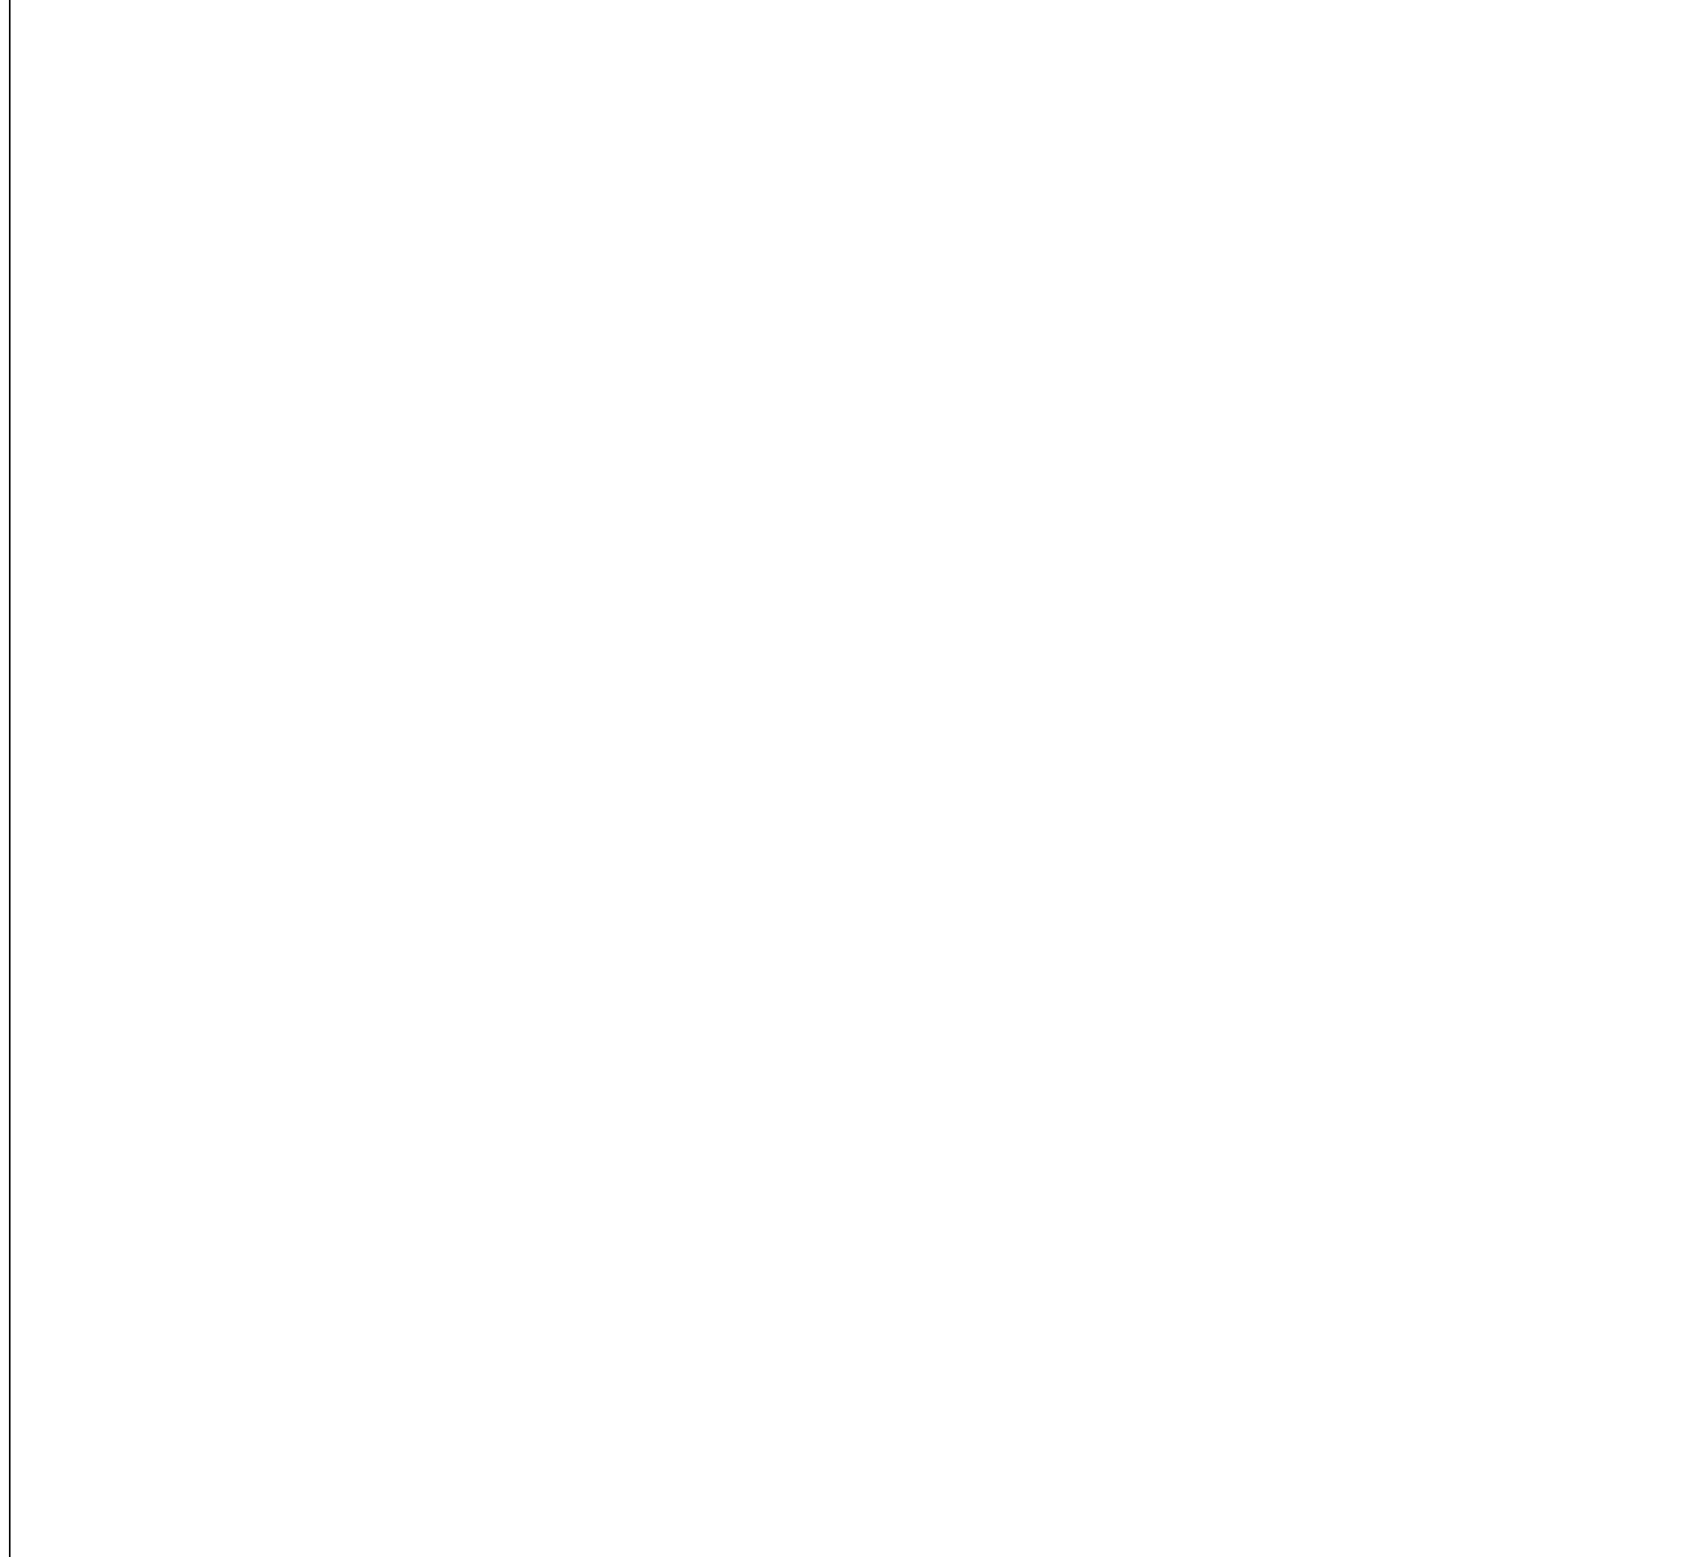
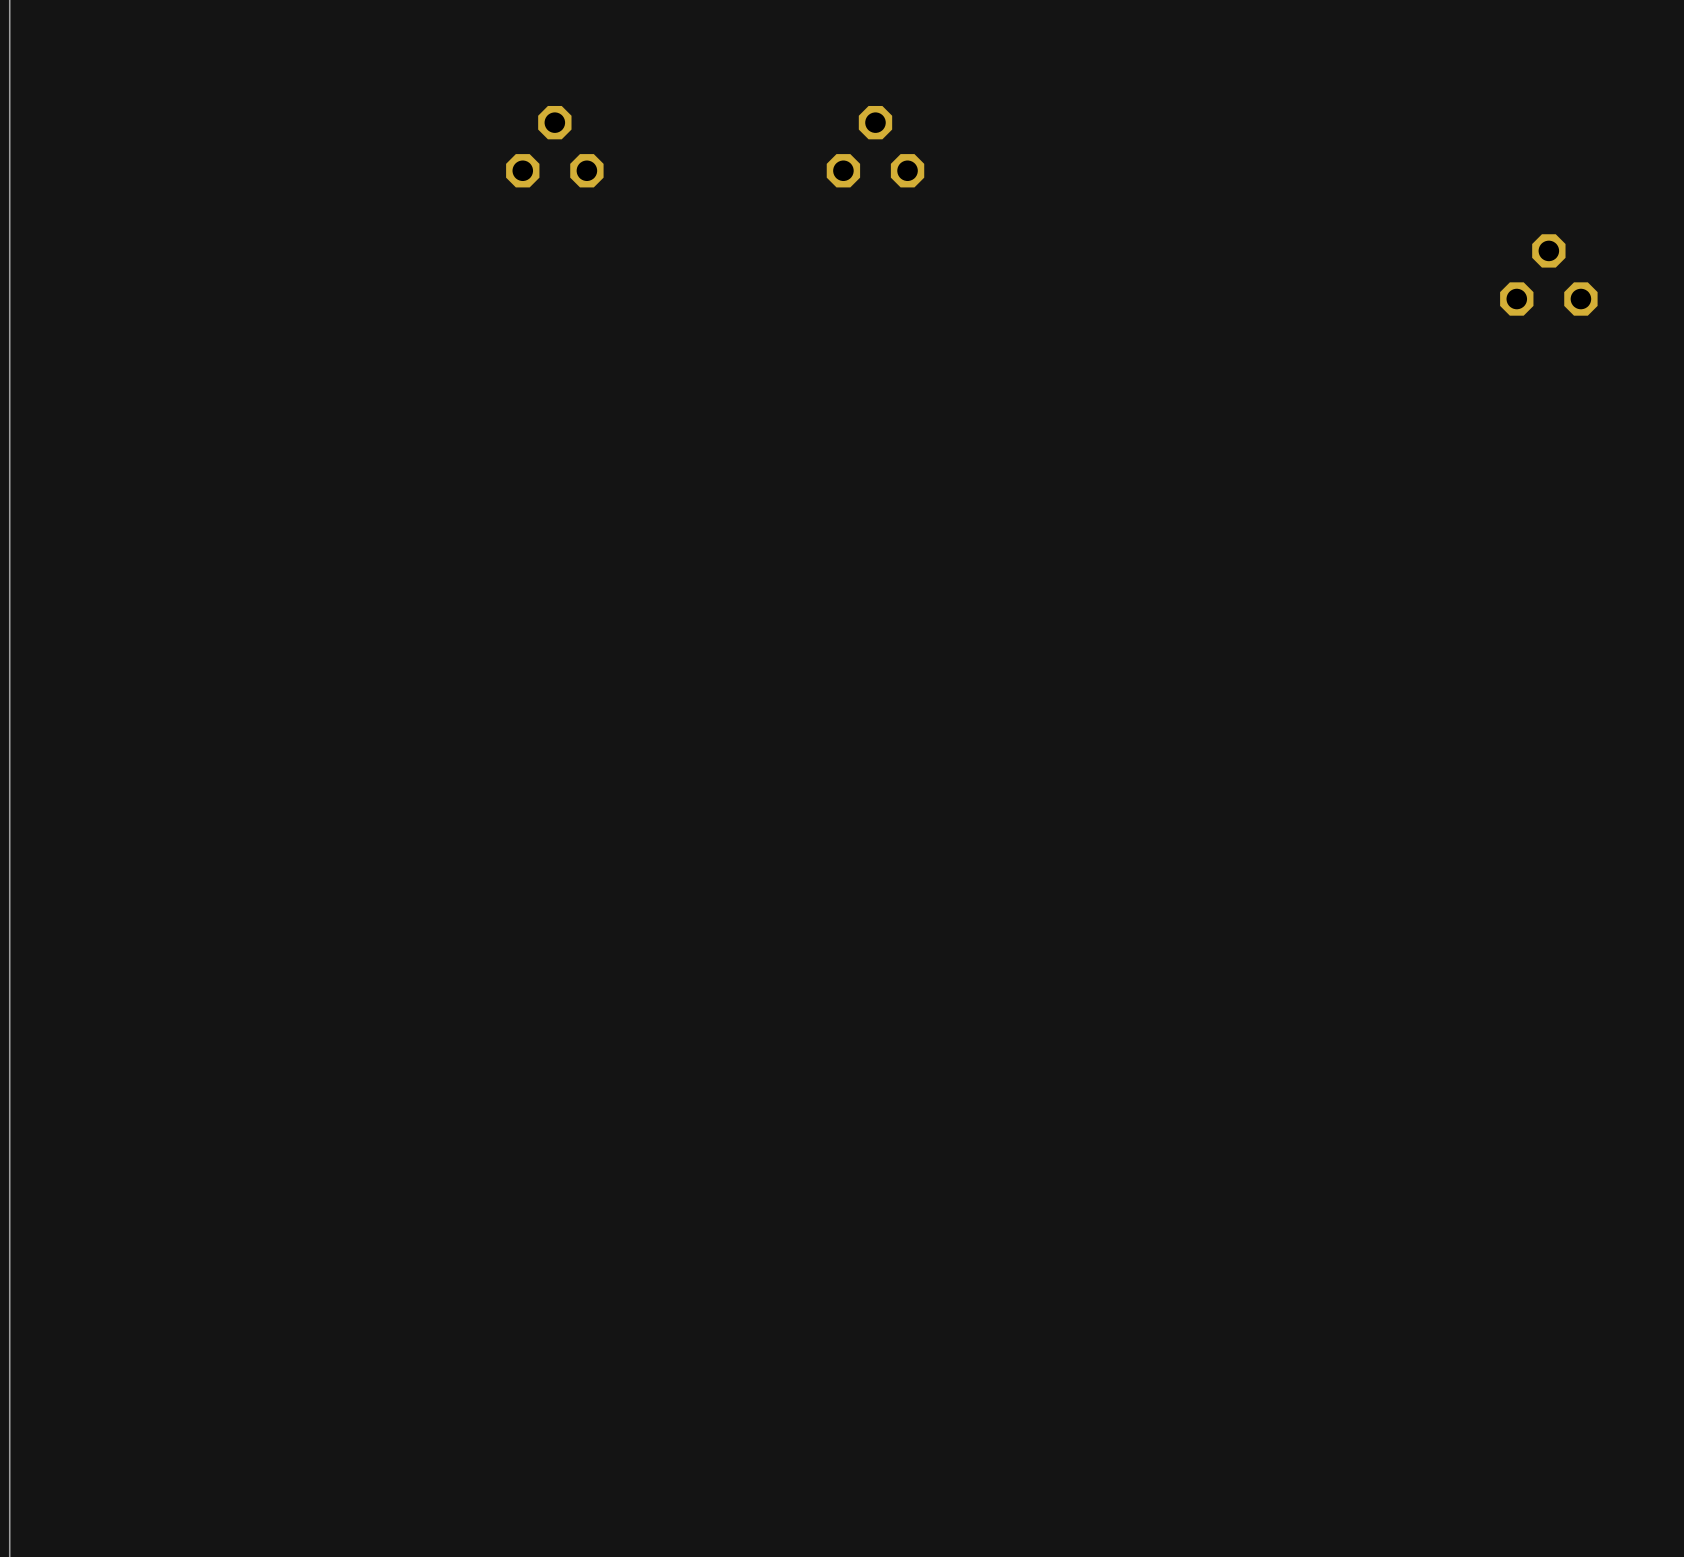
part: none -> (554, 146)
part: none -> (875, 146)
part: none -> (1548, 274)

